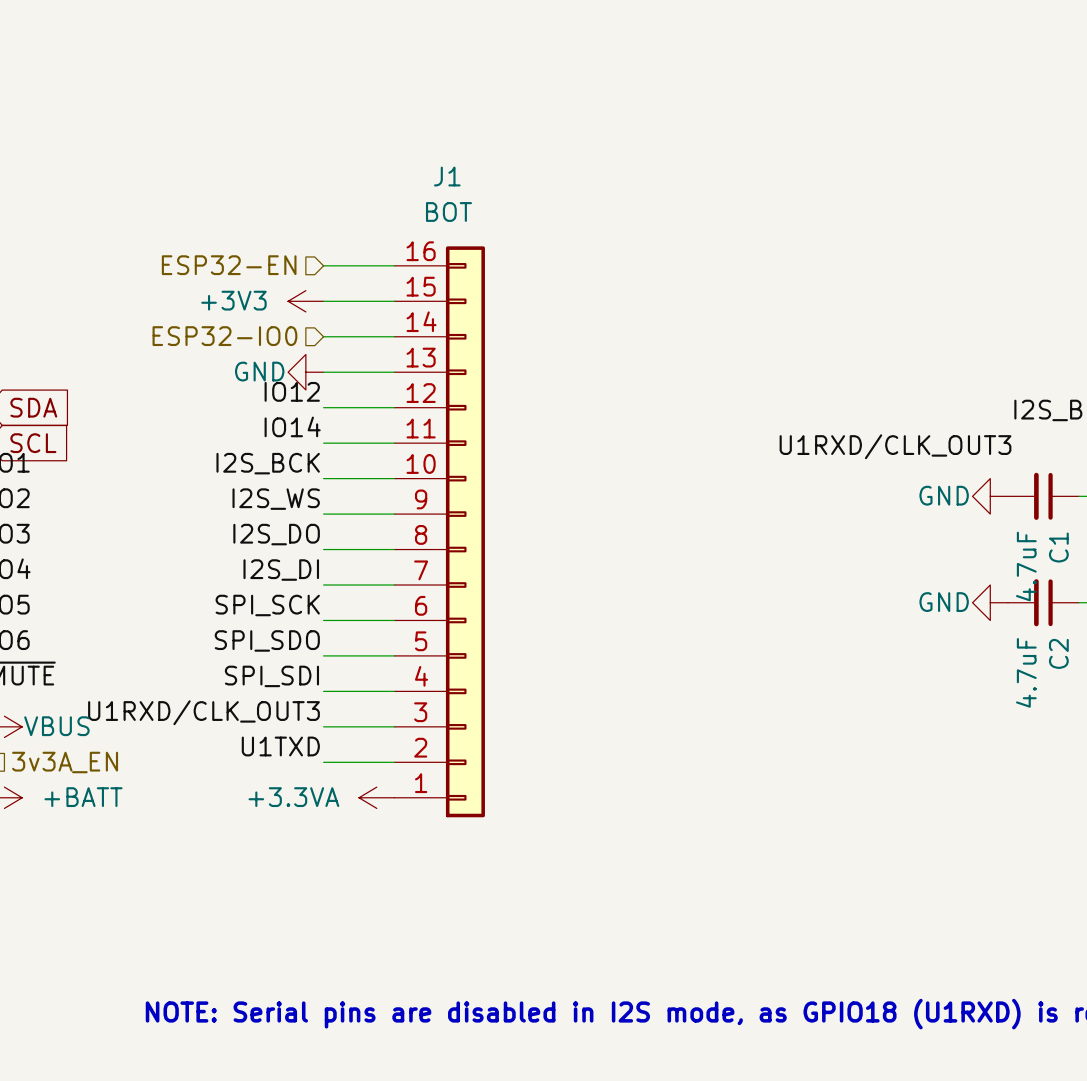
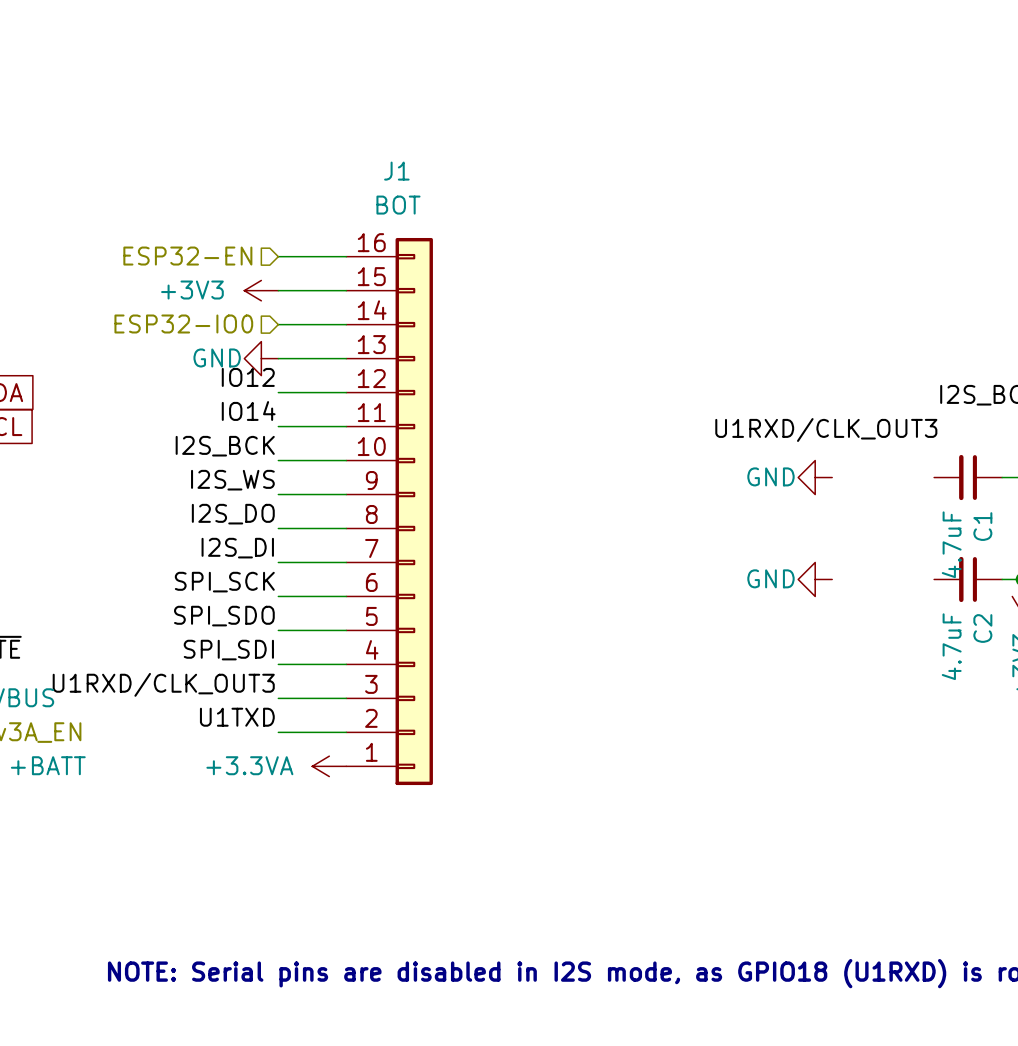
power symbol: none -> GND (815, 477)
power symbol: GND (990, 496) -> none
power symbol: none -> GND (815, 579)
power symbol: GND (990, 602) -> none

